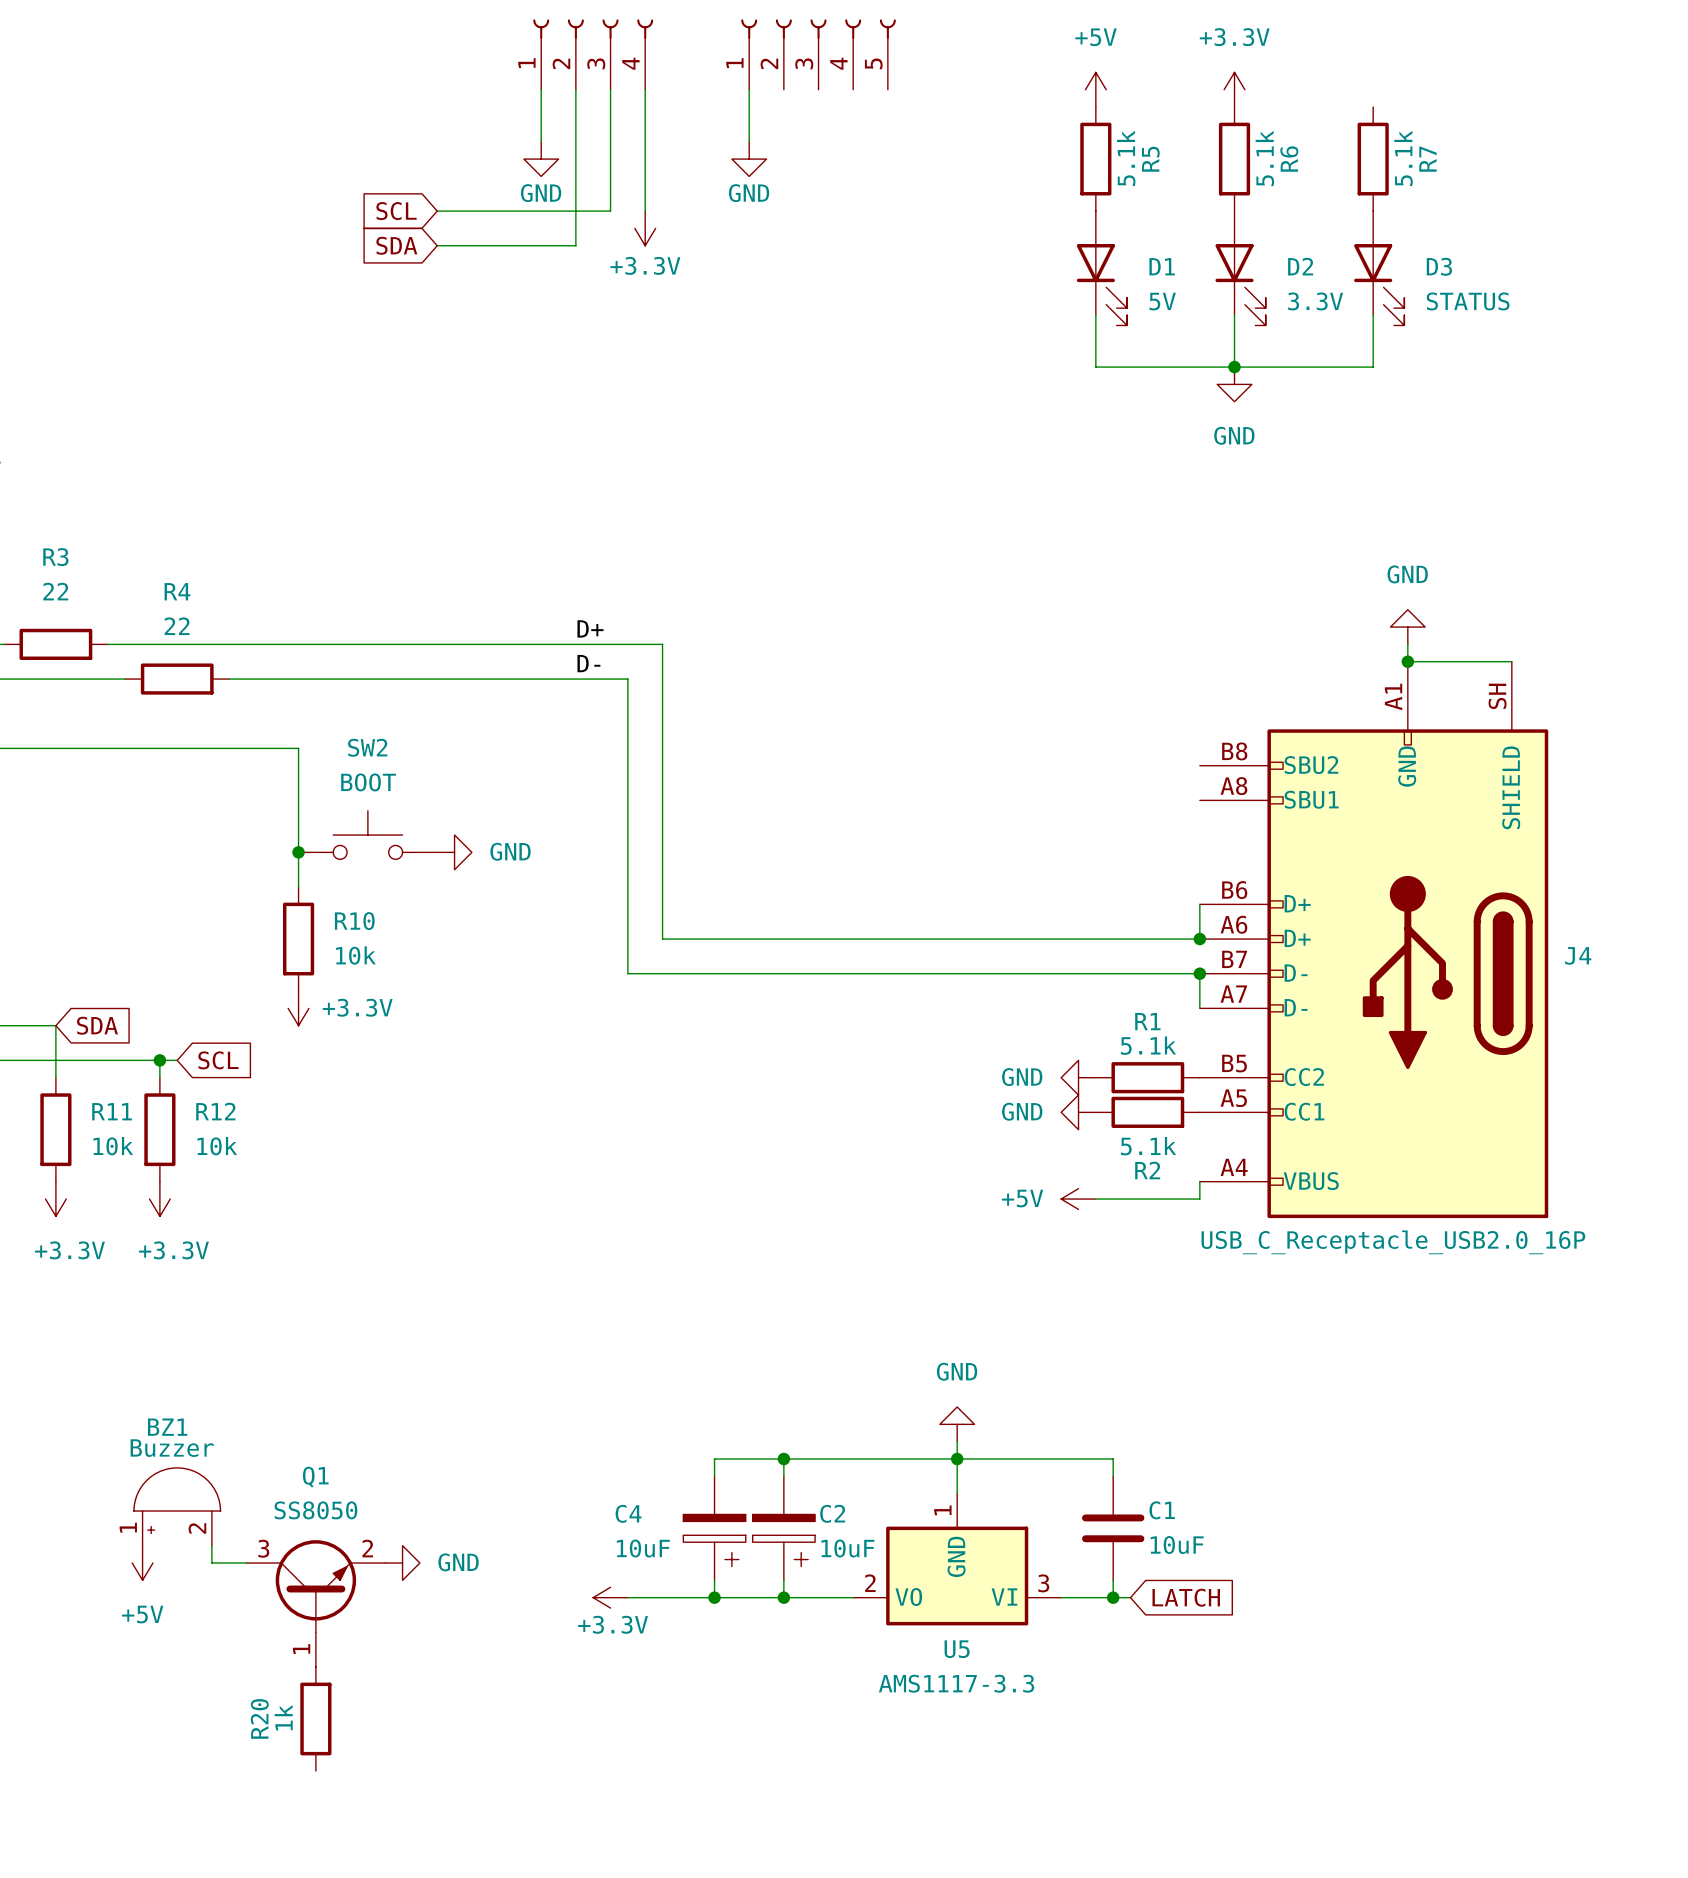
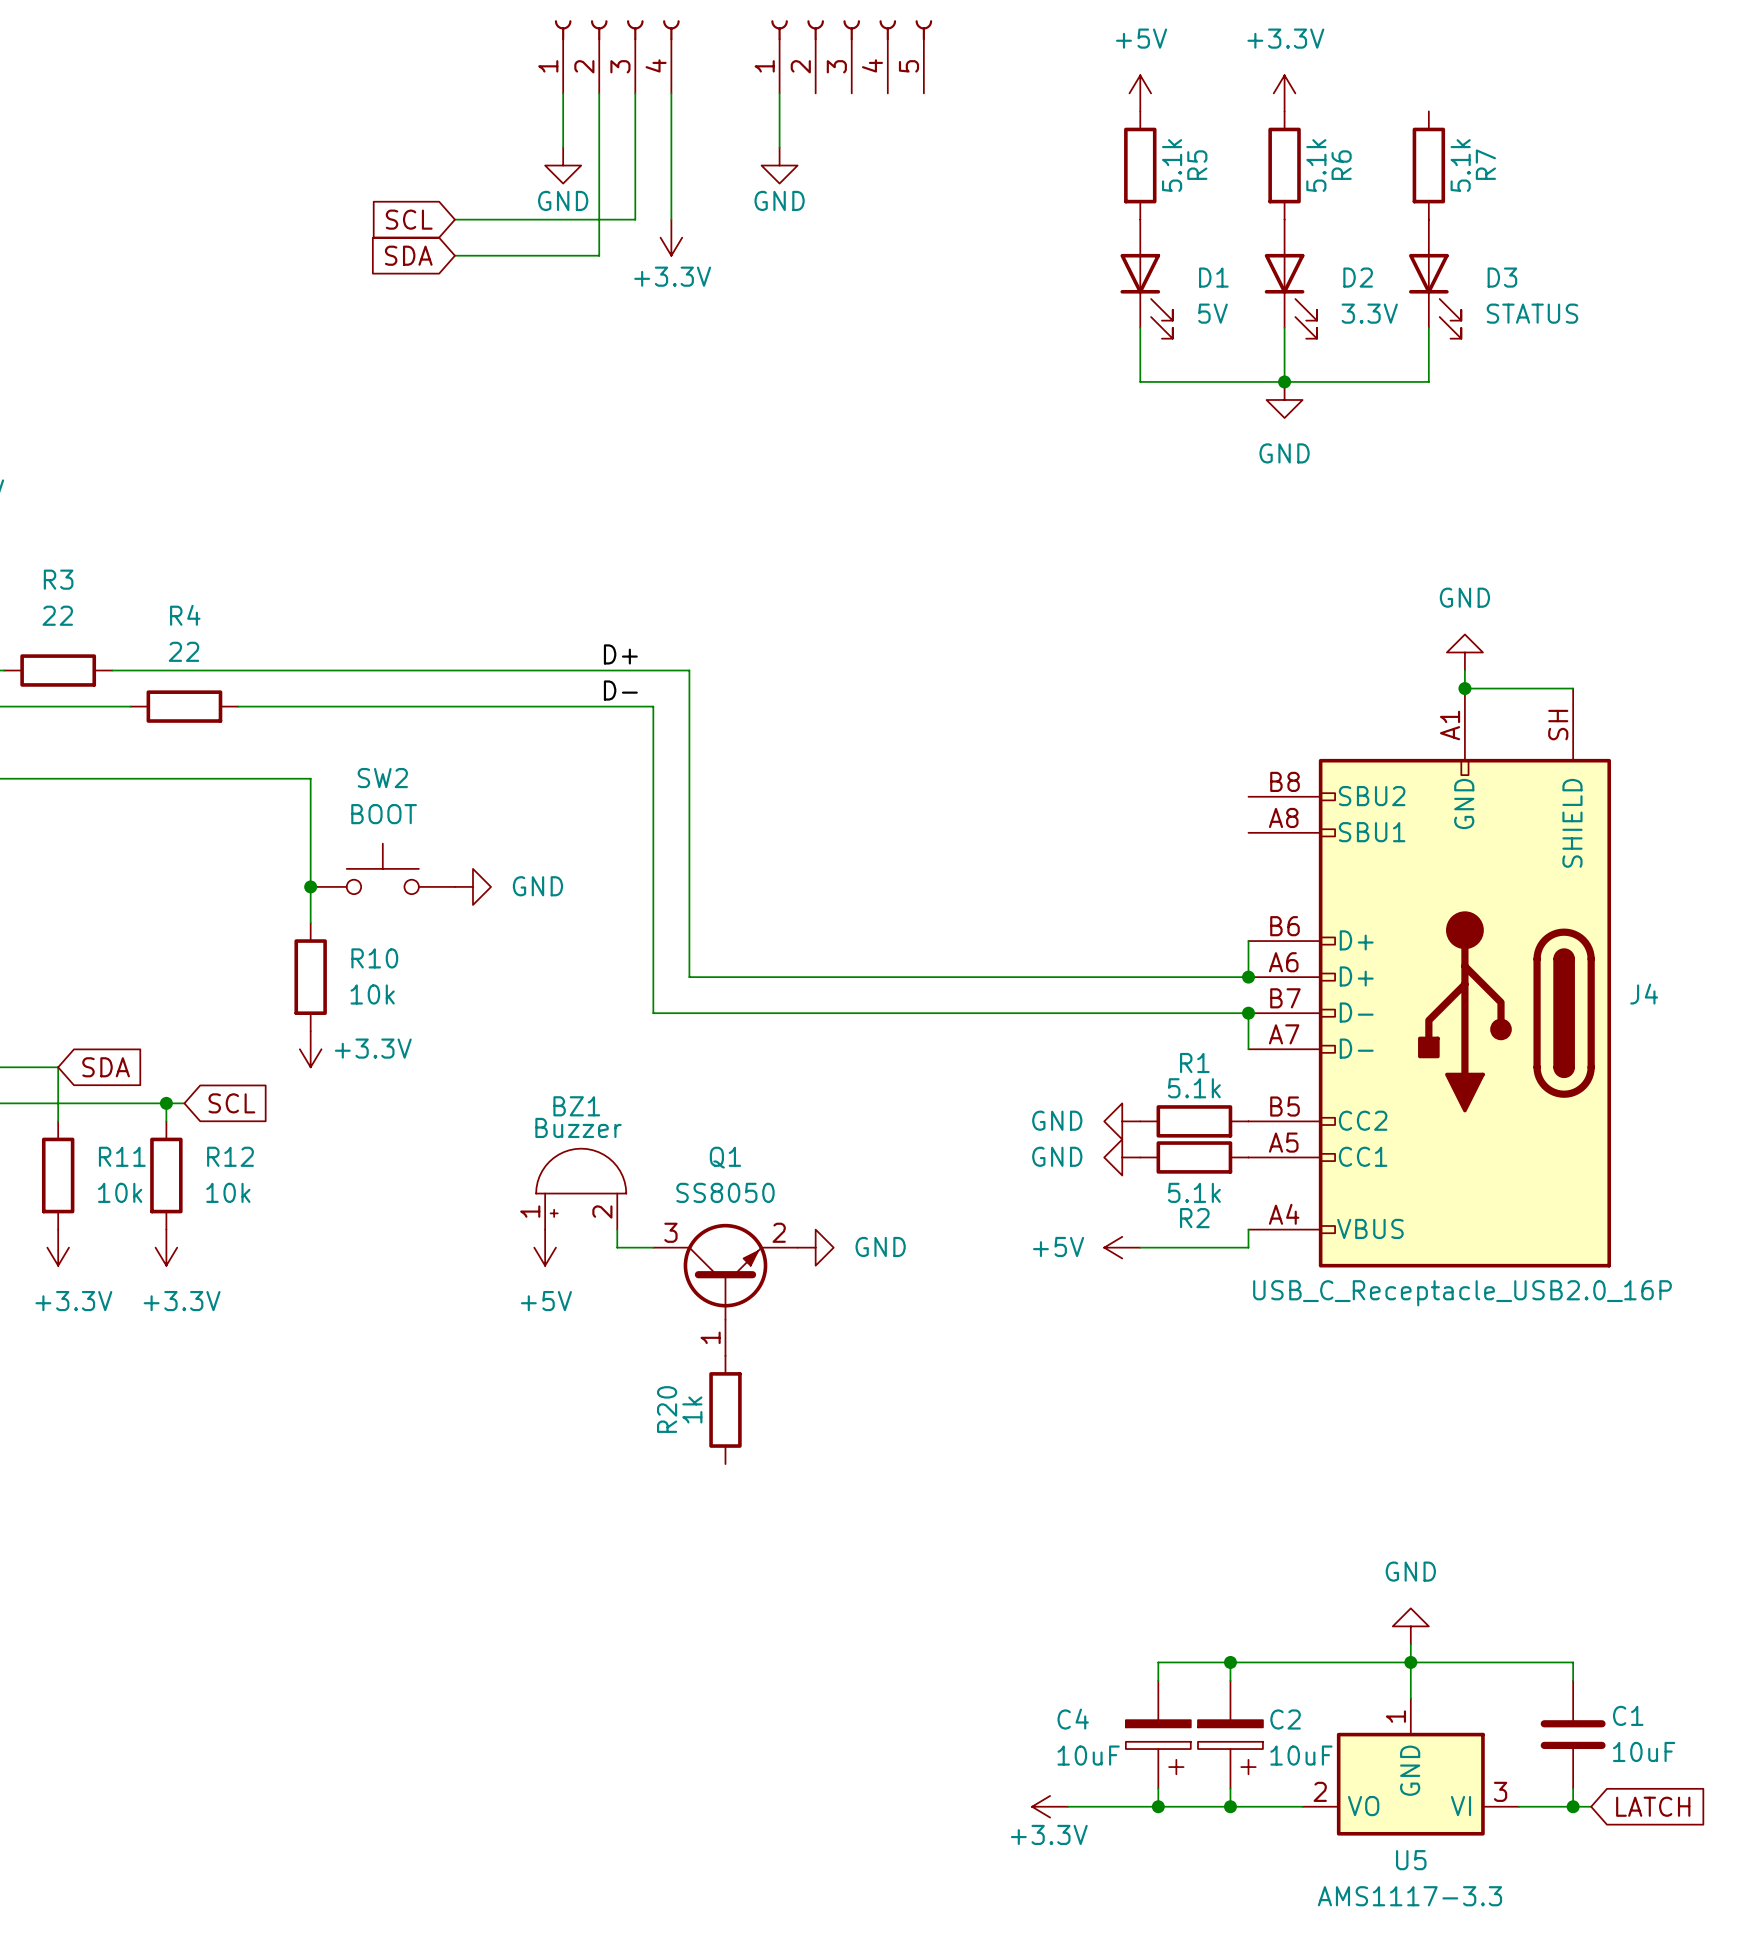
wire: none -> (617, 1229) (617, 1247) (653, 1247)
power symbol: none -> +5V (545, 1247)
power symbol: none -> GND (815, 1247)
power symbol: GND (957, 1424) -> none
wire: (957, 1441) (957, 1493) -> none
wire: (783, 1459) (783, 1476) -> none
junction: (783, 1459) -> none
junction: (957, 1459) -> none
wire: (714, 1476) (714, 1459) (1113, 1459) (1113, 1476) -> none
BZ1 position: (177, 1506) -> (581, 1189)
C4 position: (714, 1528) -> (1158, 1734)
C2 position: (783, 1528) -> (1230, 1734)
C1 position: (1113, 1528) -> (1573, 1734)
wire: (211, 1545) (211, 1563) (246, 1563) -> none
U5 position: (957, 1559) -> (1410, 1767)
power symbol: +5V (142, 1563) -> none
power symbol: GND (402, 1563) -> none
power symbol: none -> GND (1410, 1626)
wire: (714, 1580) (714, 1597) -> none
wire: (783, 1580) (783, 1597) -> (1158, 1662) (1158, 1680)
wire: (1113, 1580) (1113, 1597) (1061, 1597) -> none
wire: none -> (1410, 1644) (1410, 1698)
power symbol: +3.3V (610, 1597) -> none
wire: (627, 1597) (853, 1597) -> none
junction: (714, 1597) -> none
junction: (783, 1597) -> none
junction: (1113, 1597) -> none
wire: none -> (1176, 1662) (1573, 1662) (1573, 1680)
wire: none -> (1230, 1662) (1230, 1680)
junction: none -> (1230, 1662)
global label: LATCH (1186, 1597) -> none
junction: none -> (1410, 1662)
Q1 position: (315, 1603) -> (725, 1289)
R20 position: (315, 1719) -> (725, 1409)
wire: none -> (1158, 1788) (1158, 1806)
wire: none -> (1230, 1788) (1230, 1806)
wire: none -> (1573, 1788) (1573, 1806)
power symbol: none -> +3.3V (1050, 1806)
wire: none -> (1068, 1806) (1302, 1806)
junction: none -> (1158, 1806)
junction: none -> (1230, 1806)
wire: none -> (1519, 1806) (1591, 1806)
junction: none -> (1573, 1806)
global label: none -> LATCH (1653, 1806)

